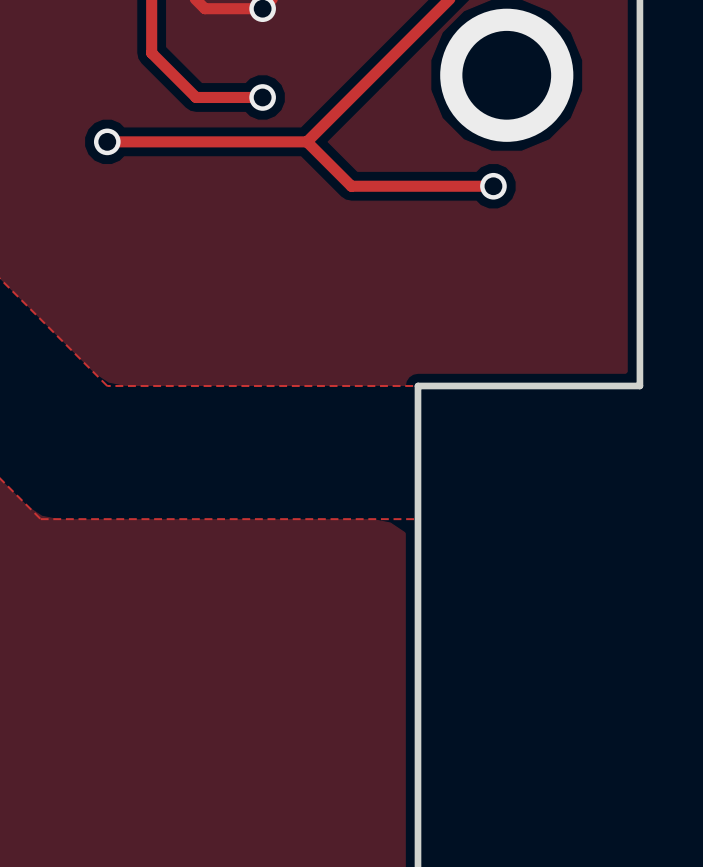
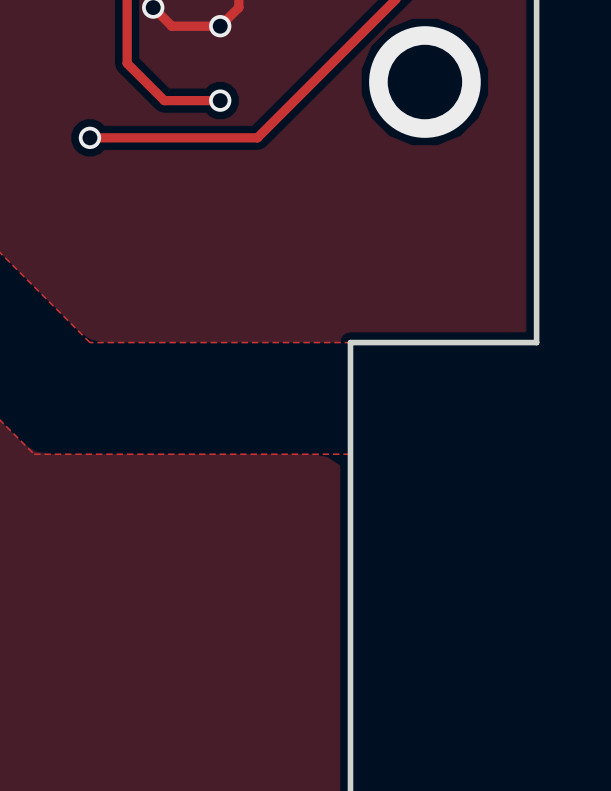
track: (307, 141) (351, 186) (493, 186) -> none
via: (493, 186) -> none

